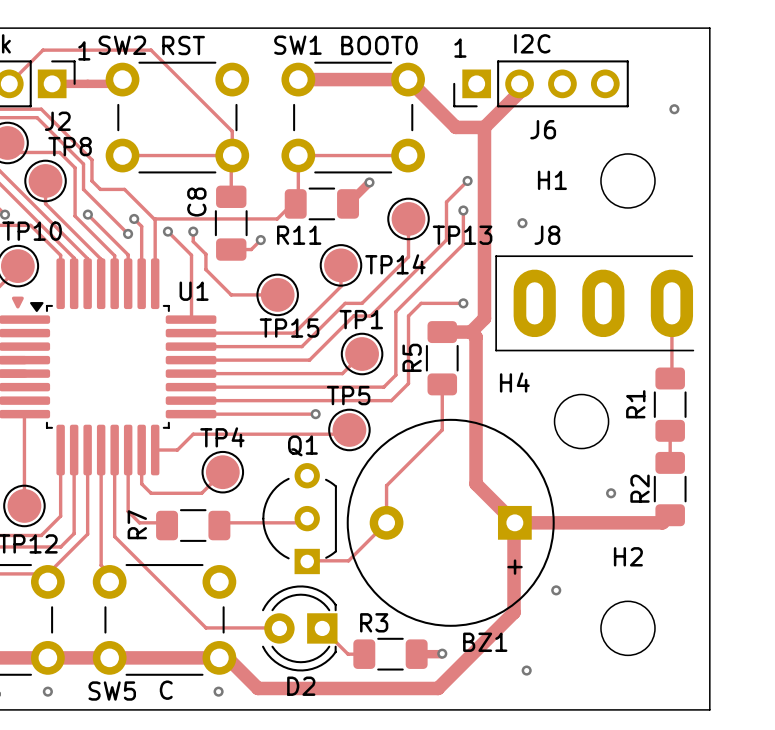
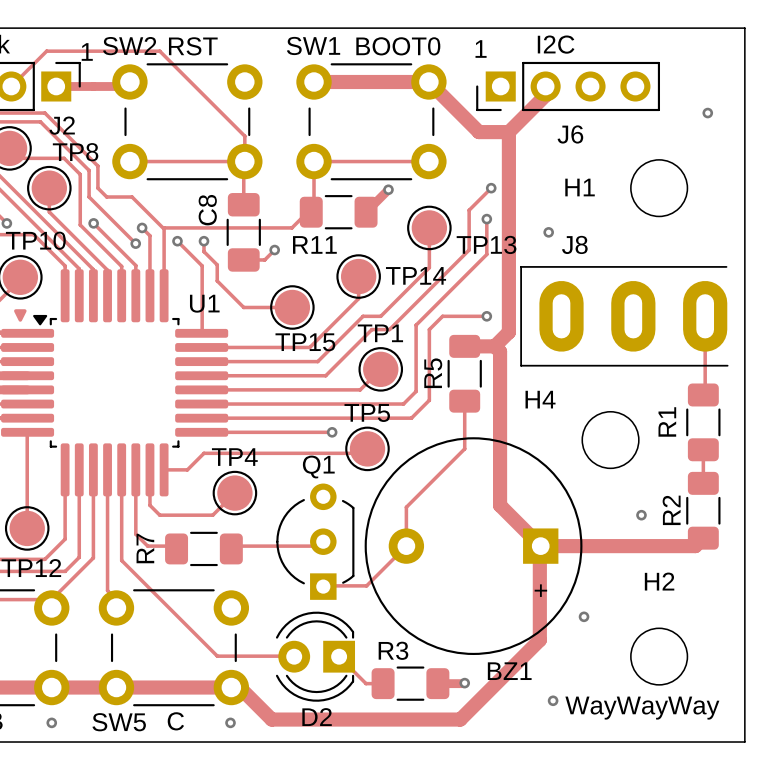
text: none -> WayWayWay (642, 708)

